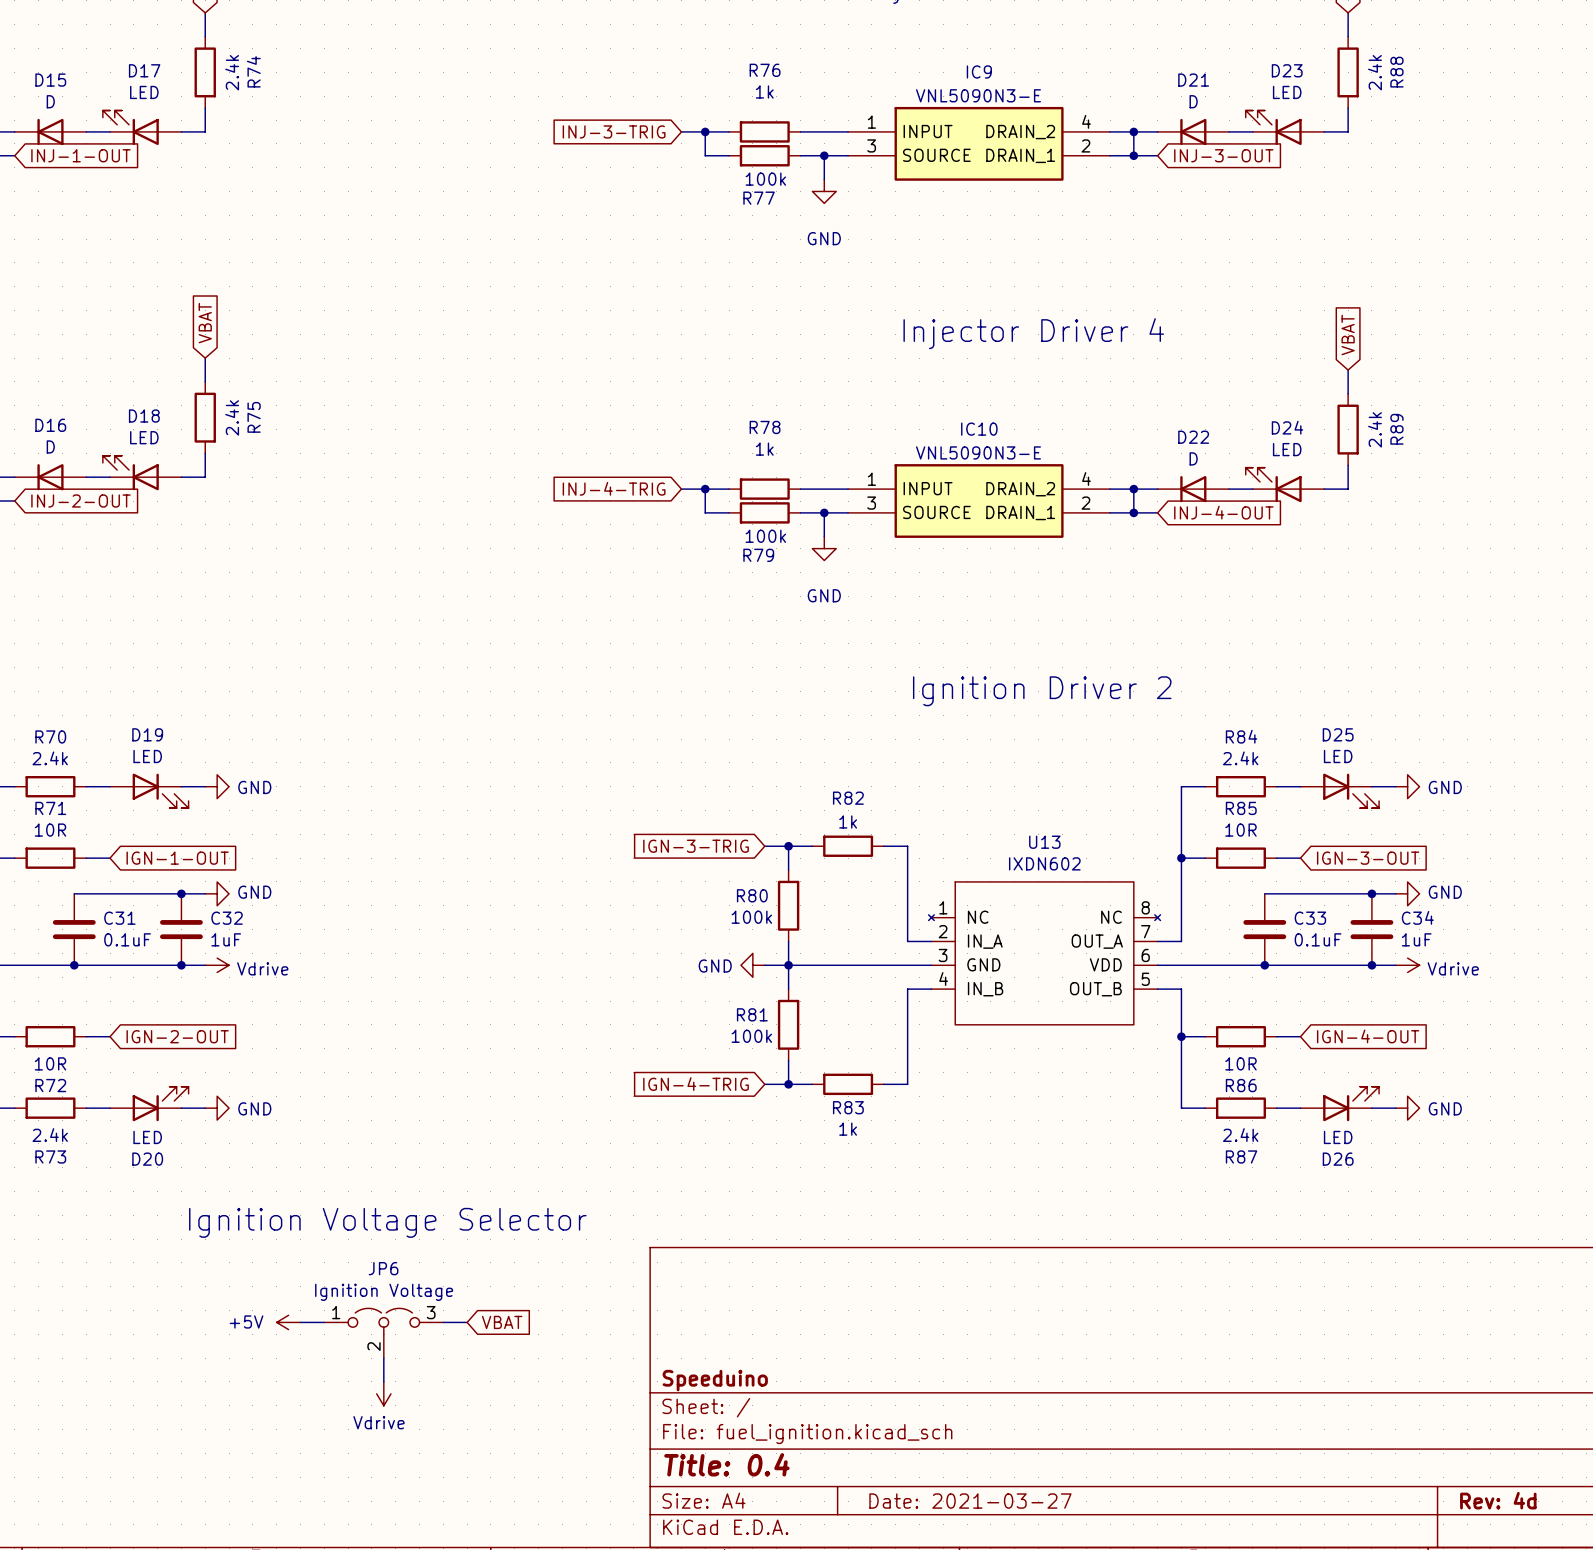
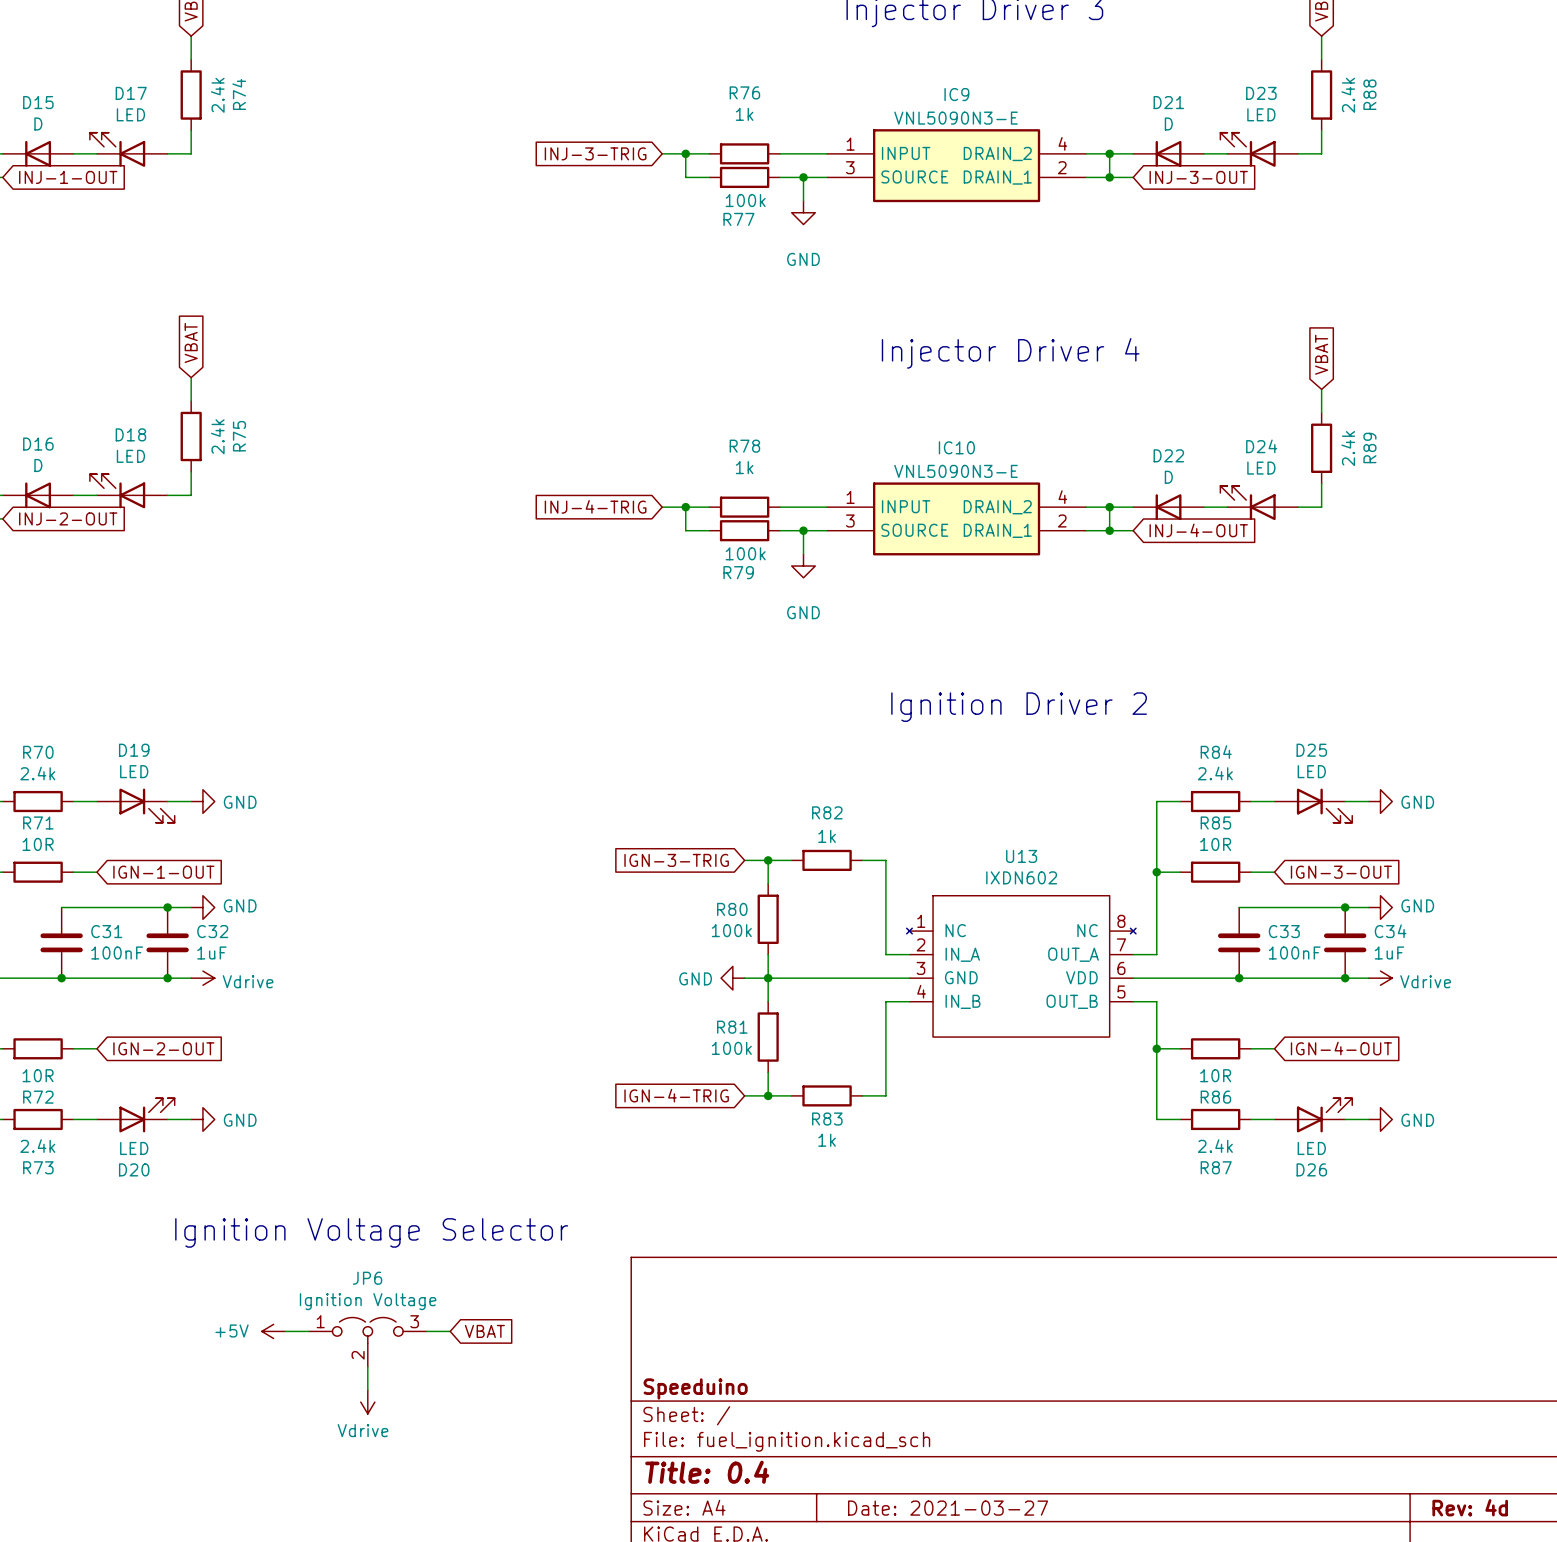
C31 value: 0.1uF (127, 939) -> 100nF (117, 952)
C33 value: 0.1uF (1318, 939) -> 100nF (1294, 952)

